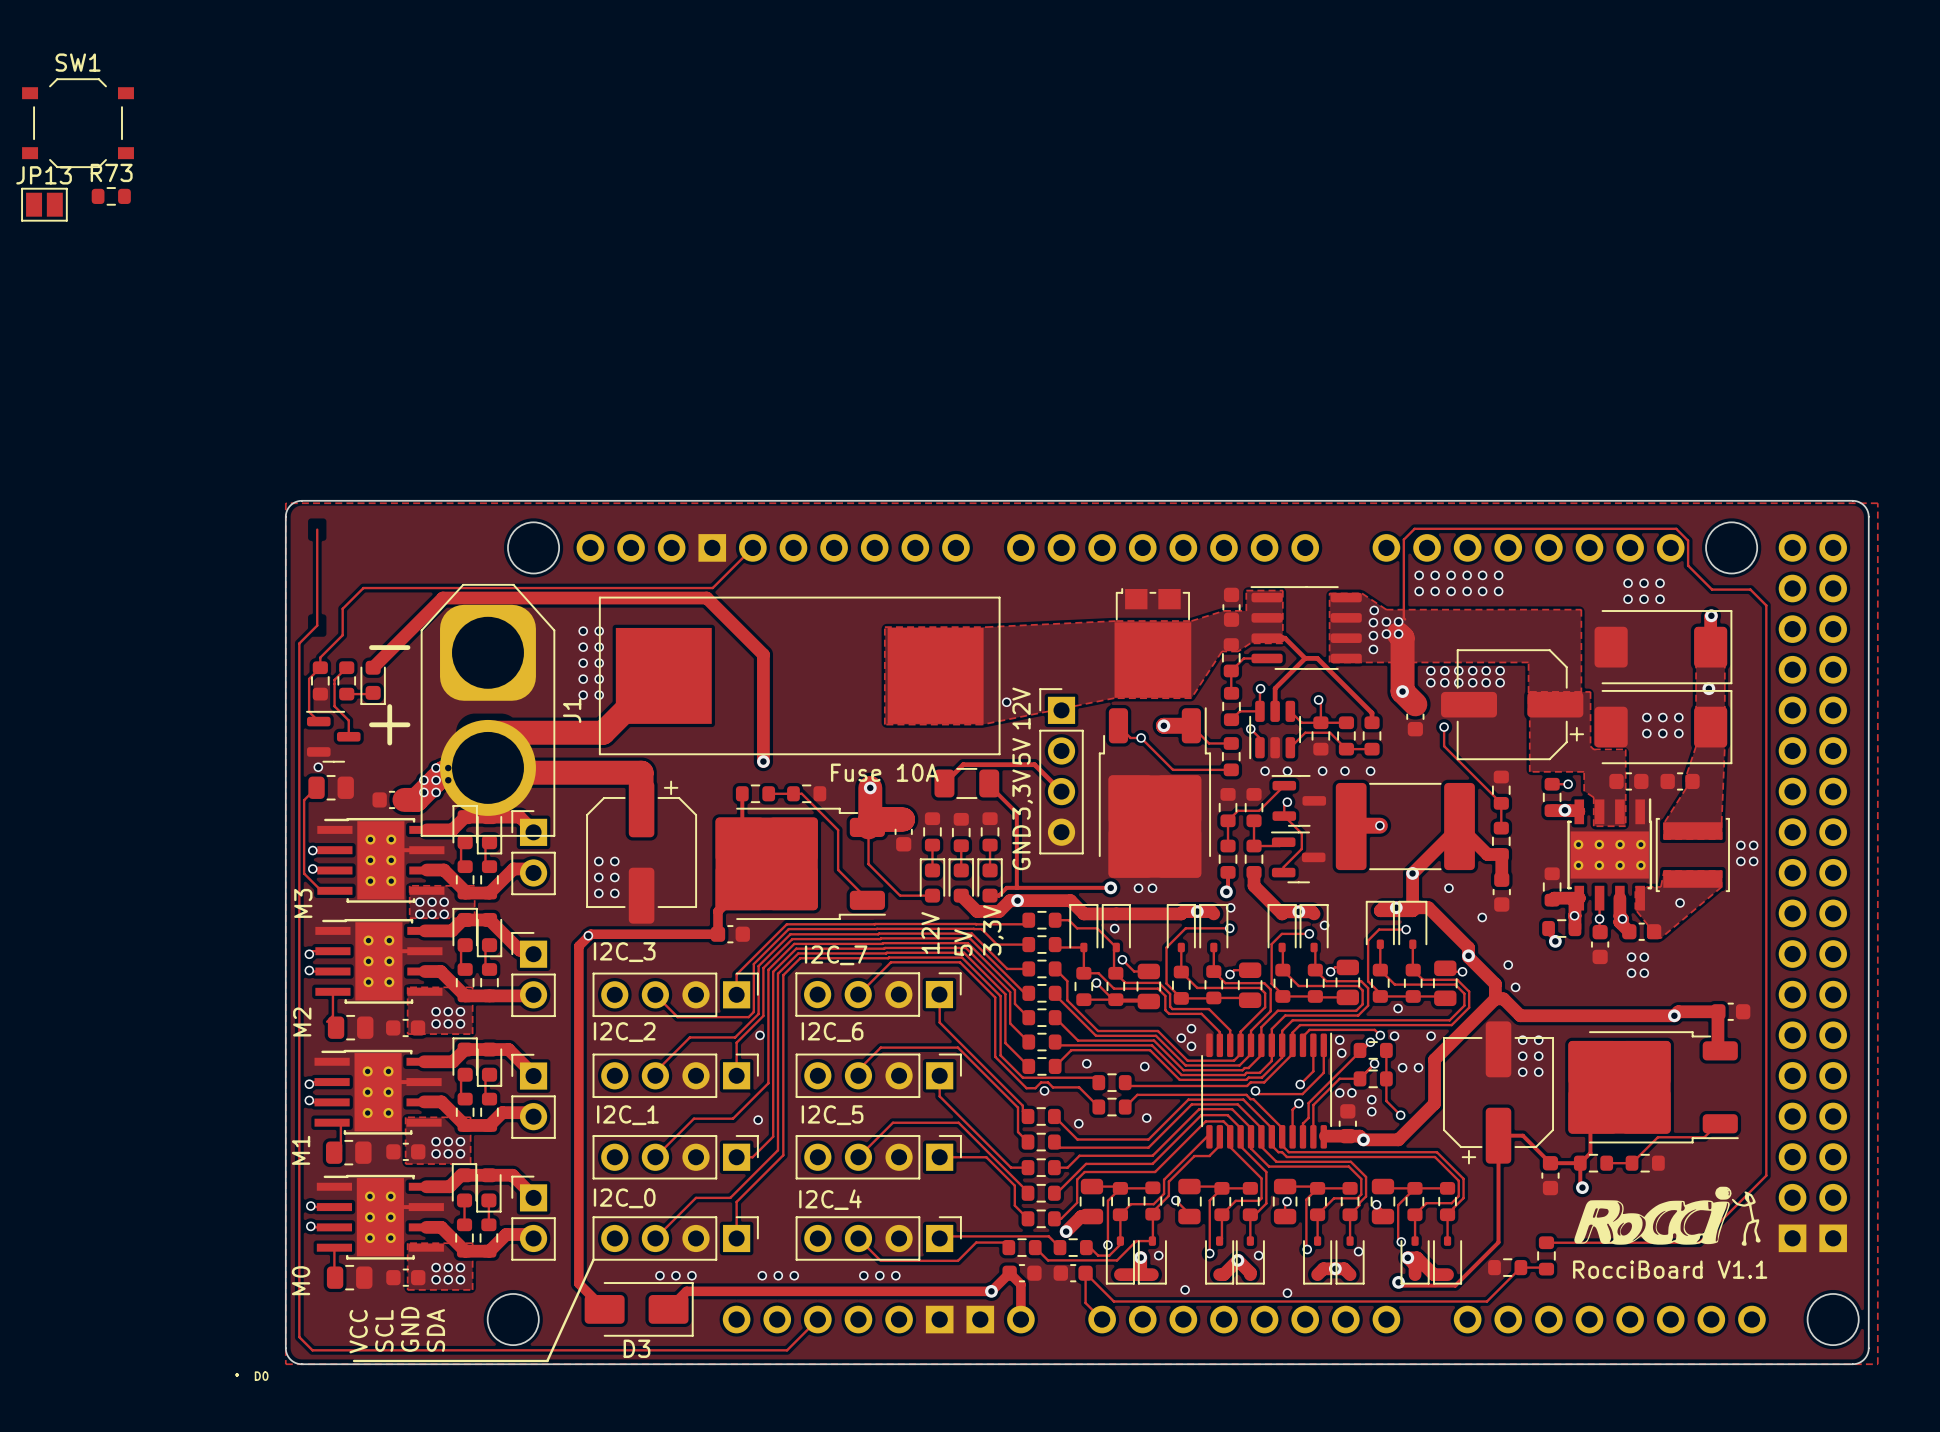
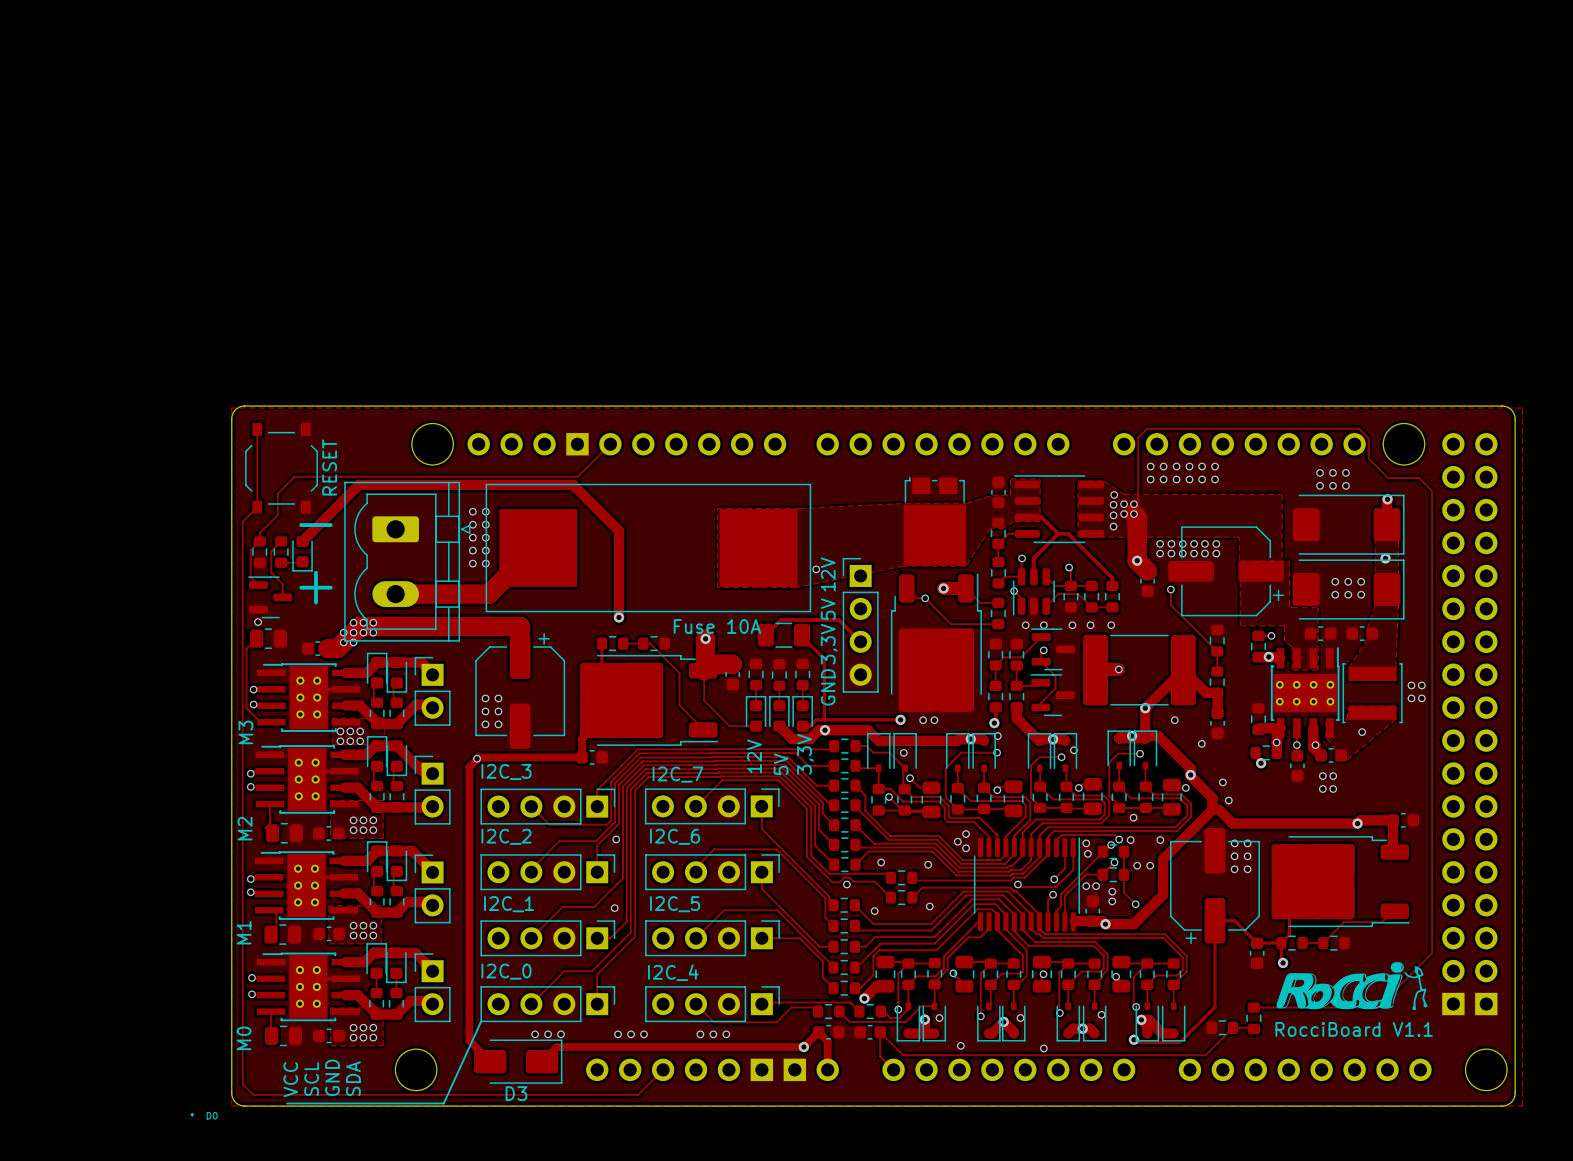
SW1: (78, 123) -> none
R73: (111, 196) -> none
JP13: (44, 204) -> none
RESET: none -> (281, 468)
part: none -> (407, 561)
J1: (487, 710) -> none

